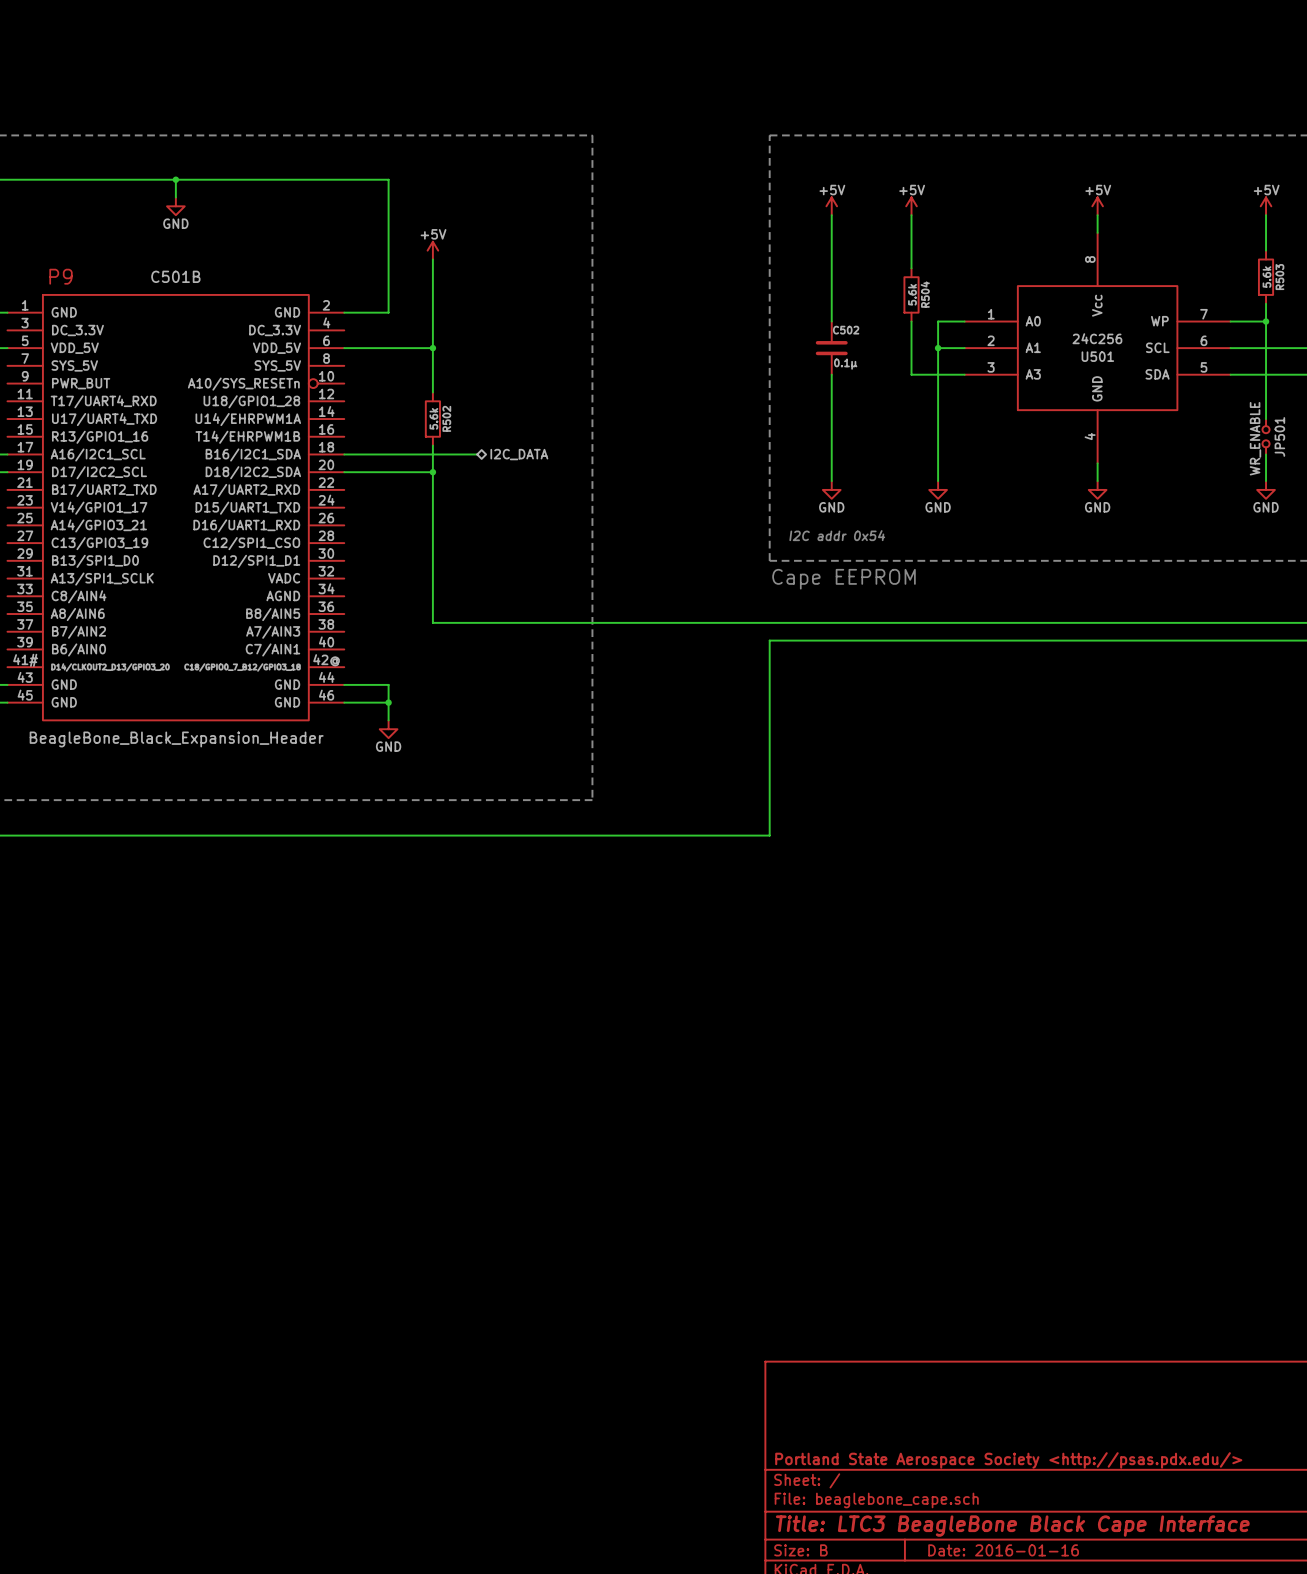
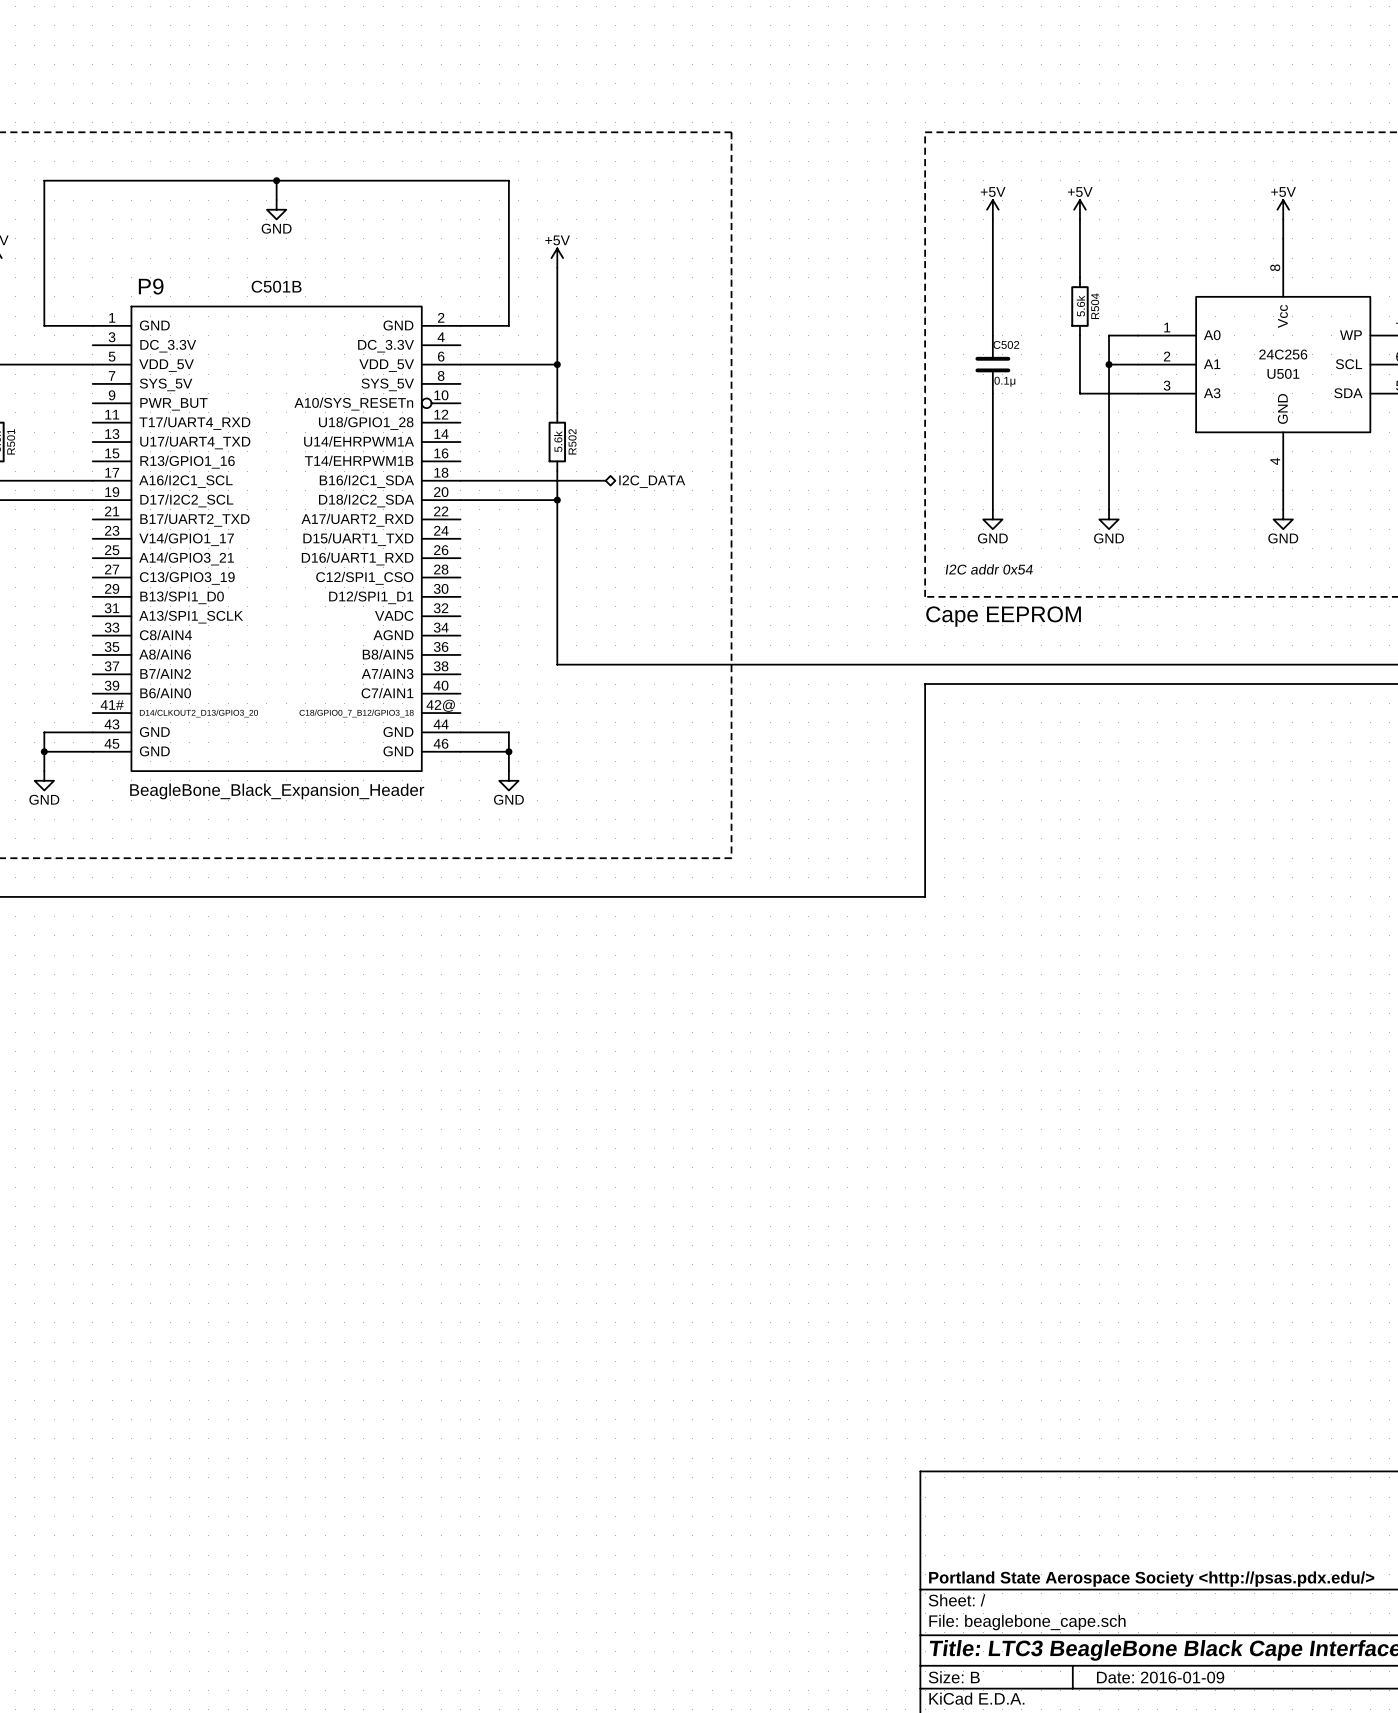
title block: Date: 2016-01-16 (1003, 1550) -> Date: 2016-01-09 (1160, 1677)

